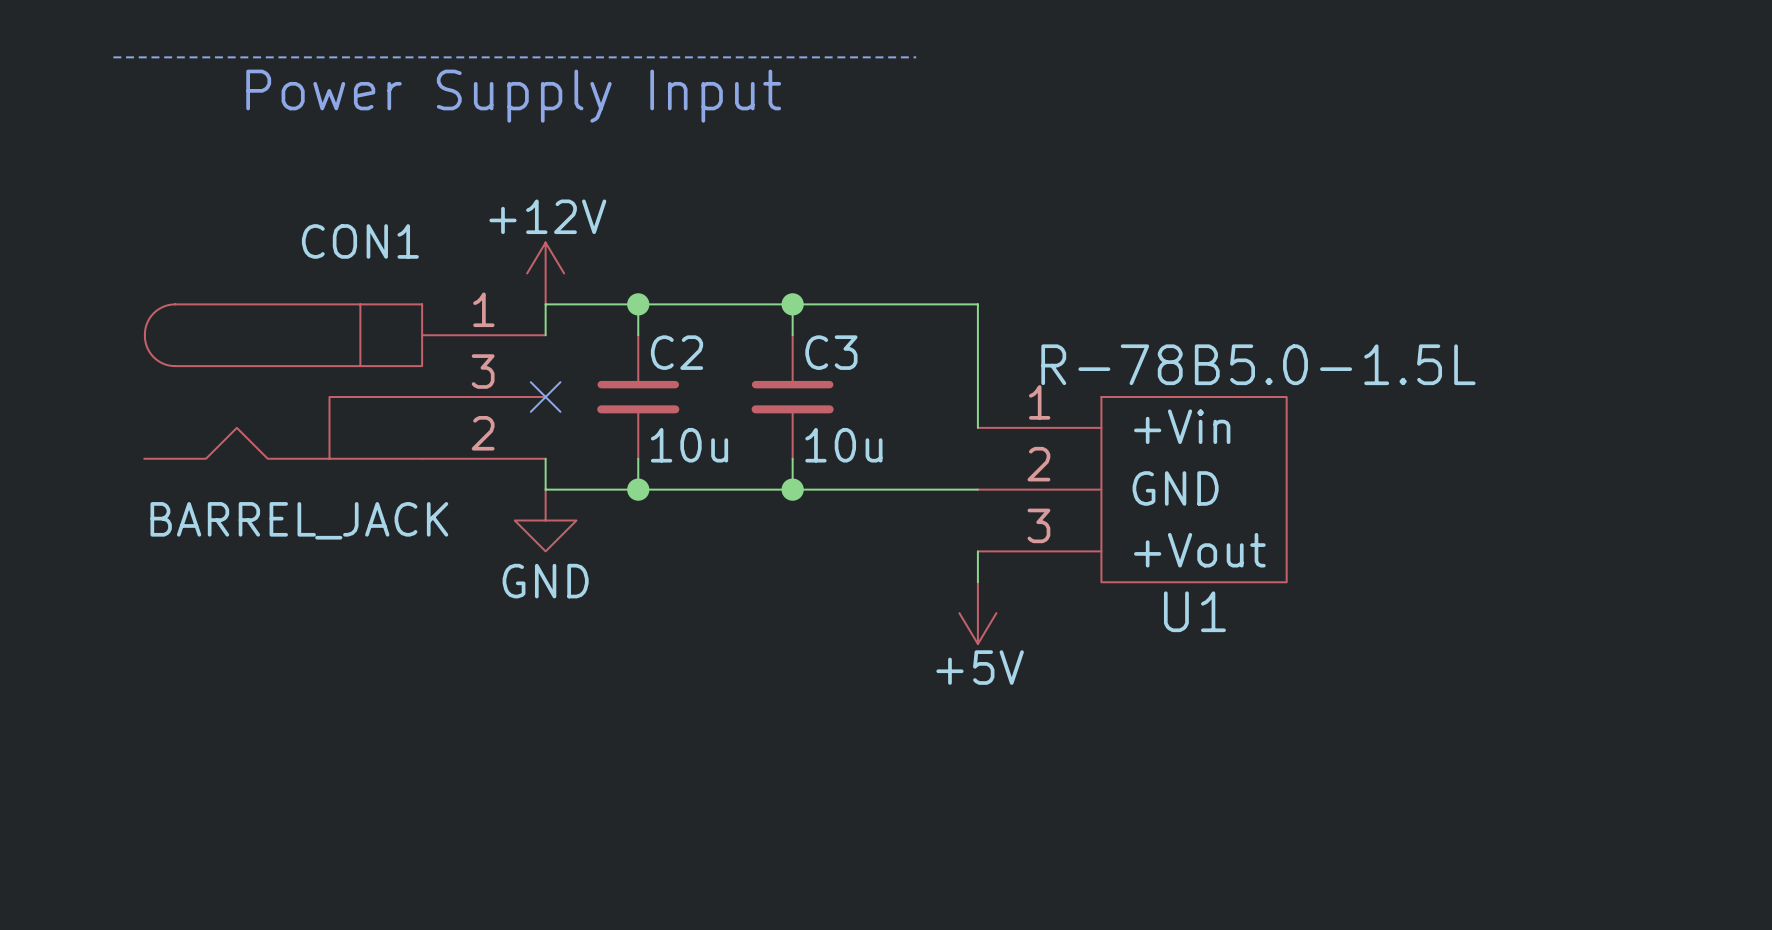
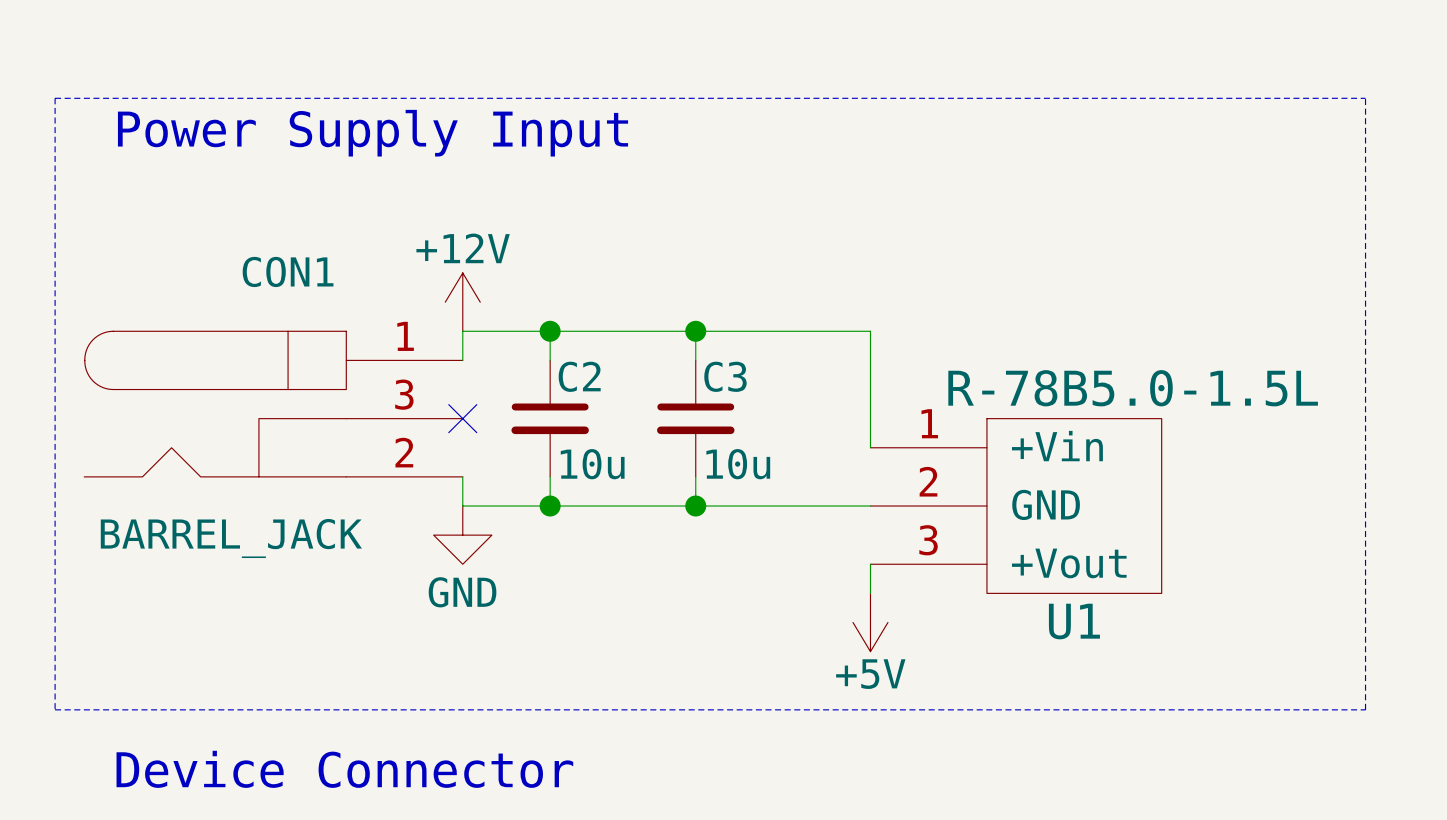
line: none -> (55, 98) (55, 709) (1365, 709) (1365, 98) (812, 98)
text position: Power Supply Input (513, 96) -> Power Supply Input (373, 133)
text: none -> Device Connector (344, 769)

